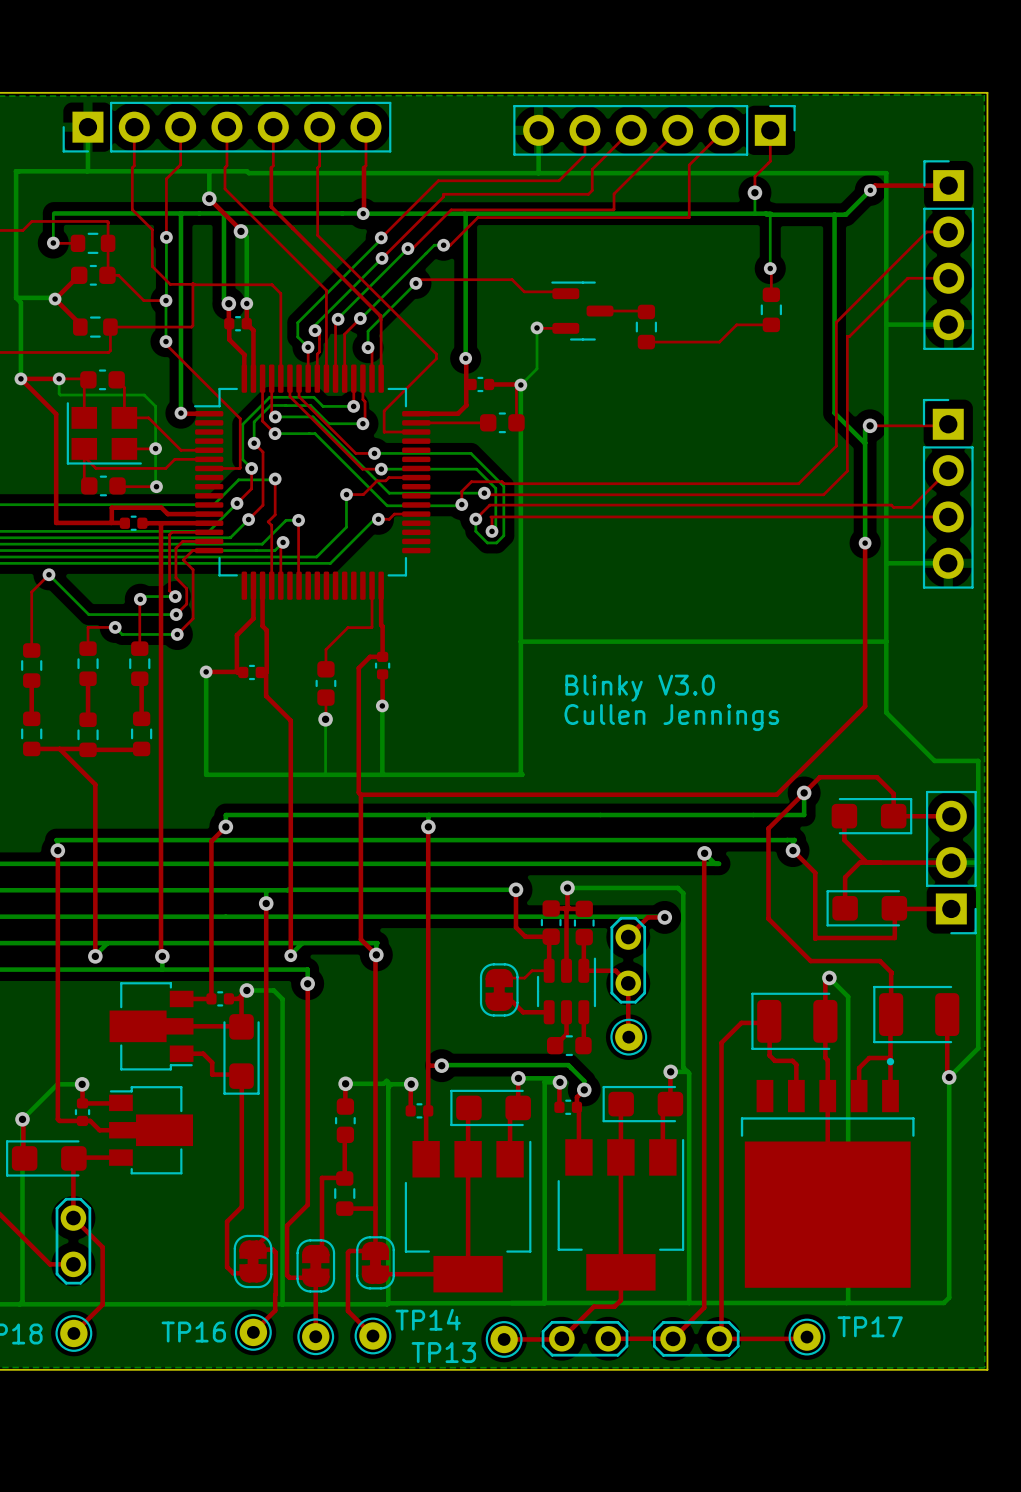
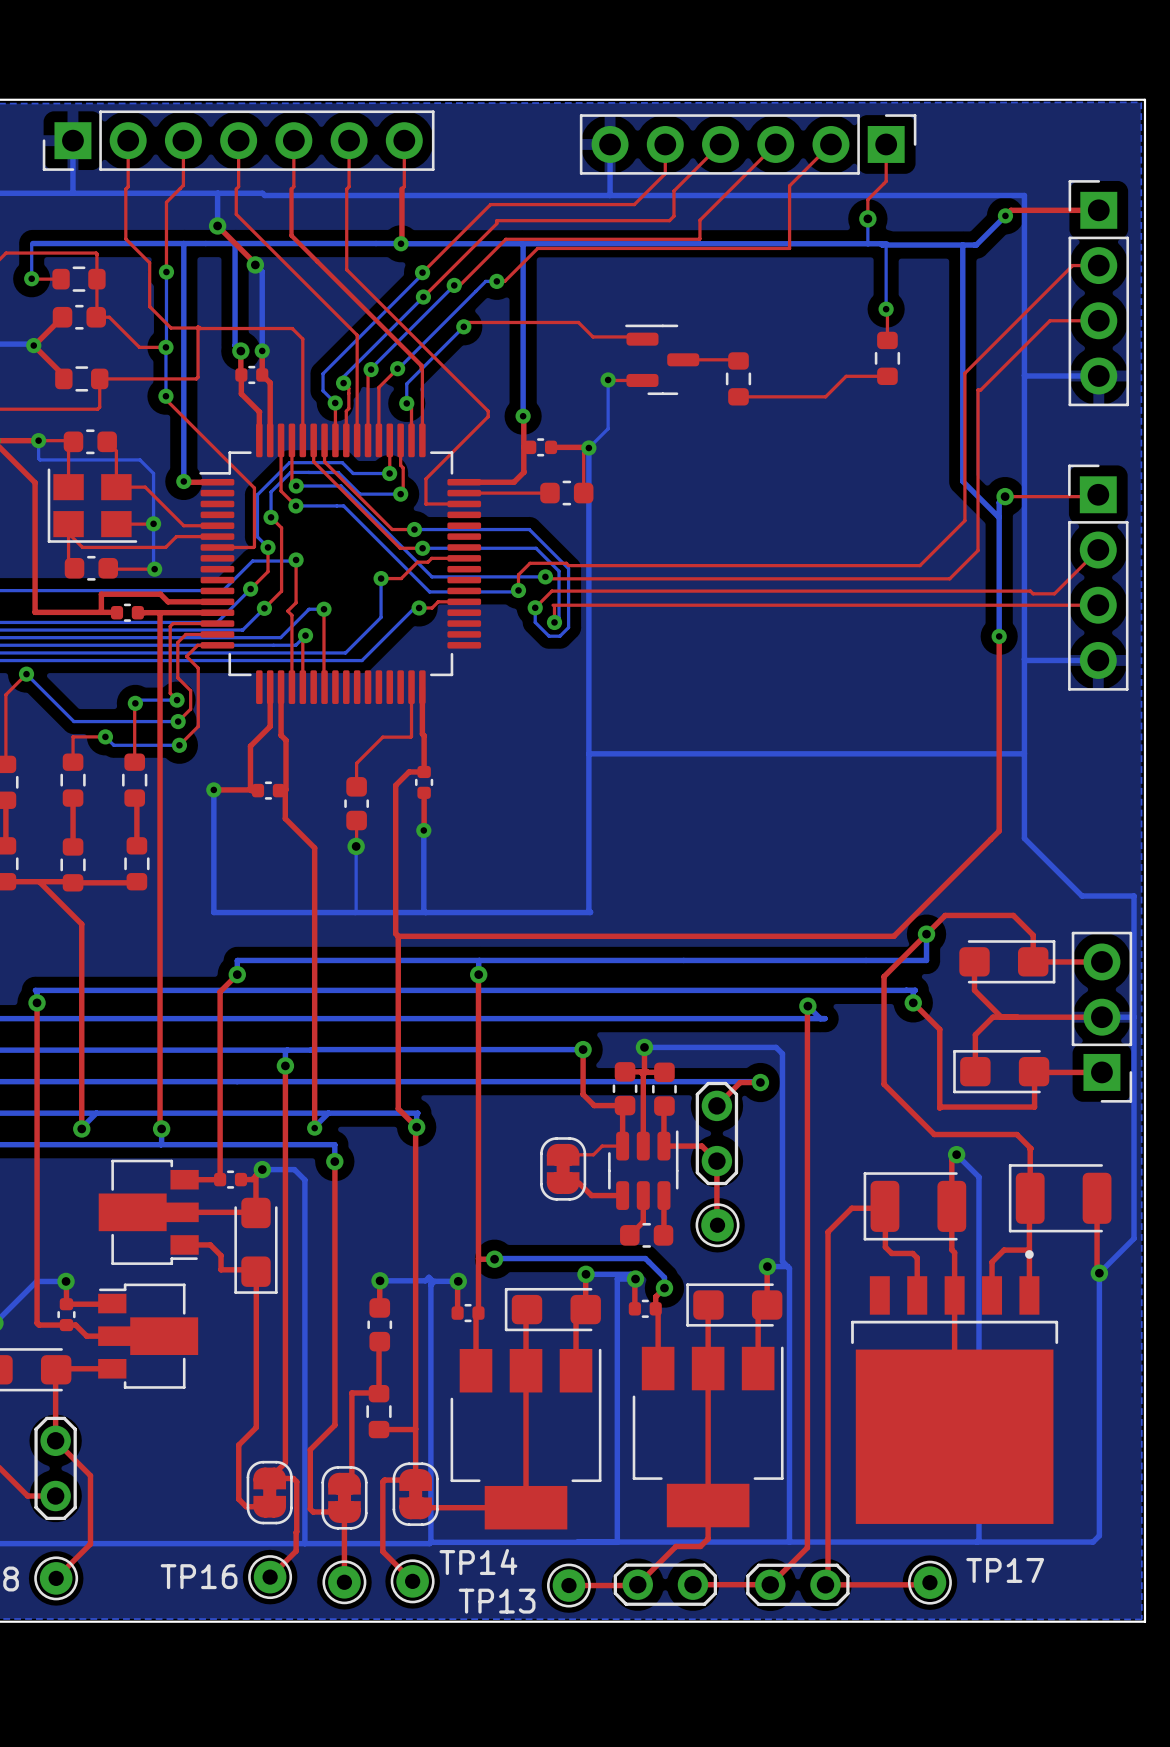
text: Blinky V3.0 (640, 688) -> none
text: Cullen Jennings (671, 717) -> none

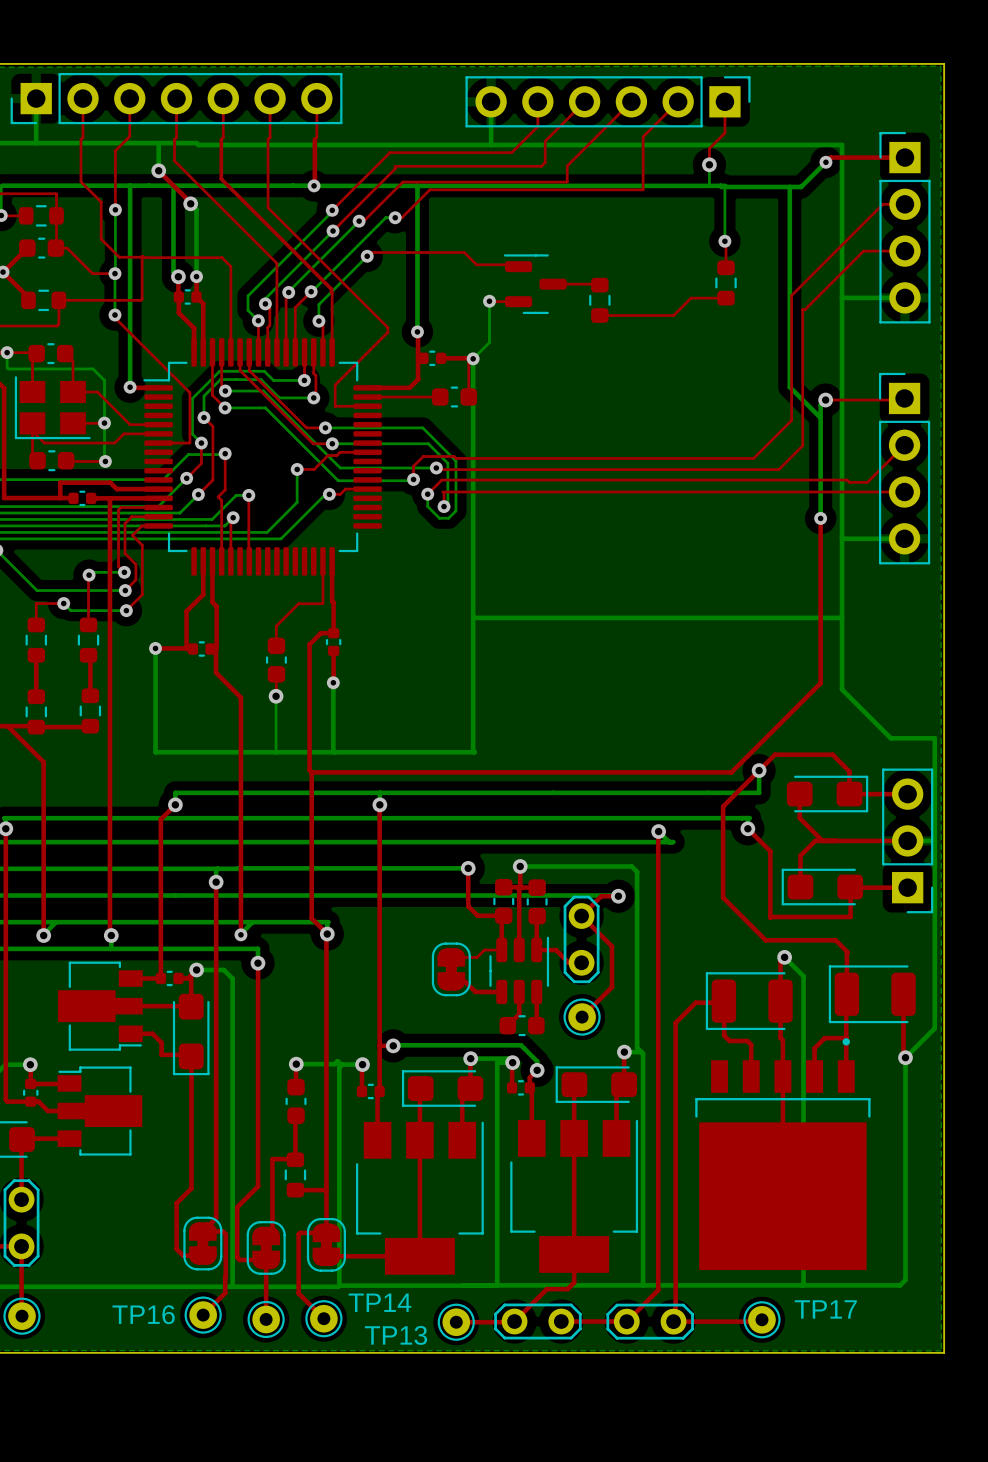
top track: (686, 1146) (701, 1146) (716, 1161) (717, 1225) -> (581, 916) (611, 946) (611, 987) (582, 1017)
top track: none -> (556, 950) (568, 962) (581, 962)
top track: (55, 1440) (90, 1475) (90, 1544) (56, 1578) -> (21, 1246) (22, 1316)

